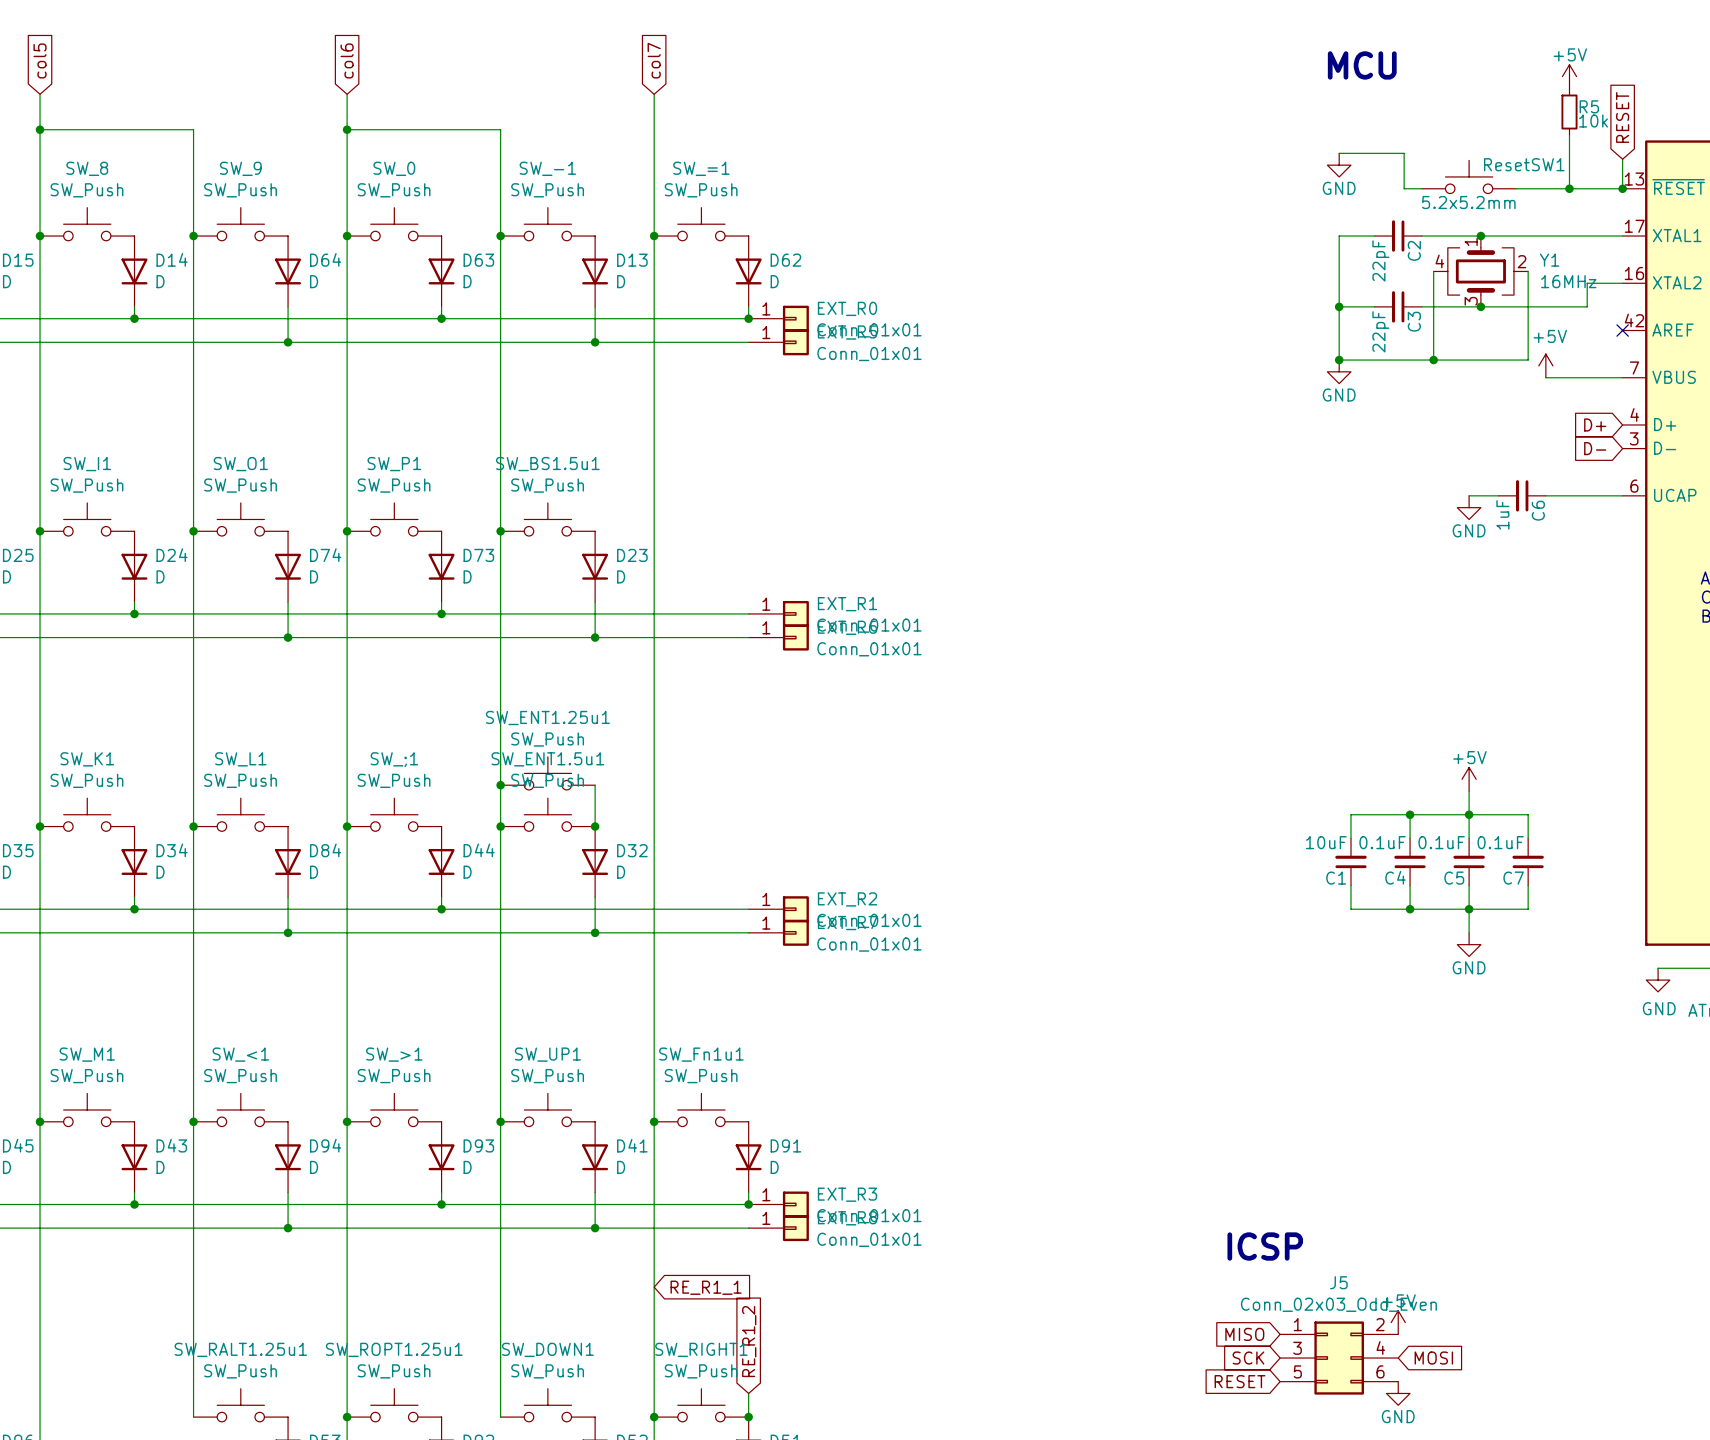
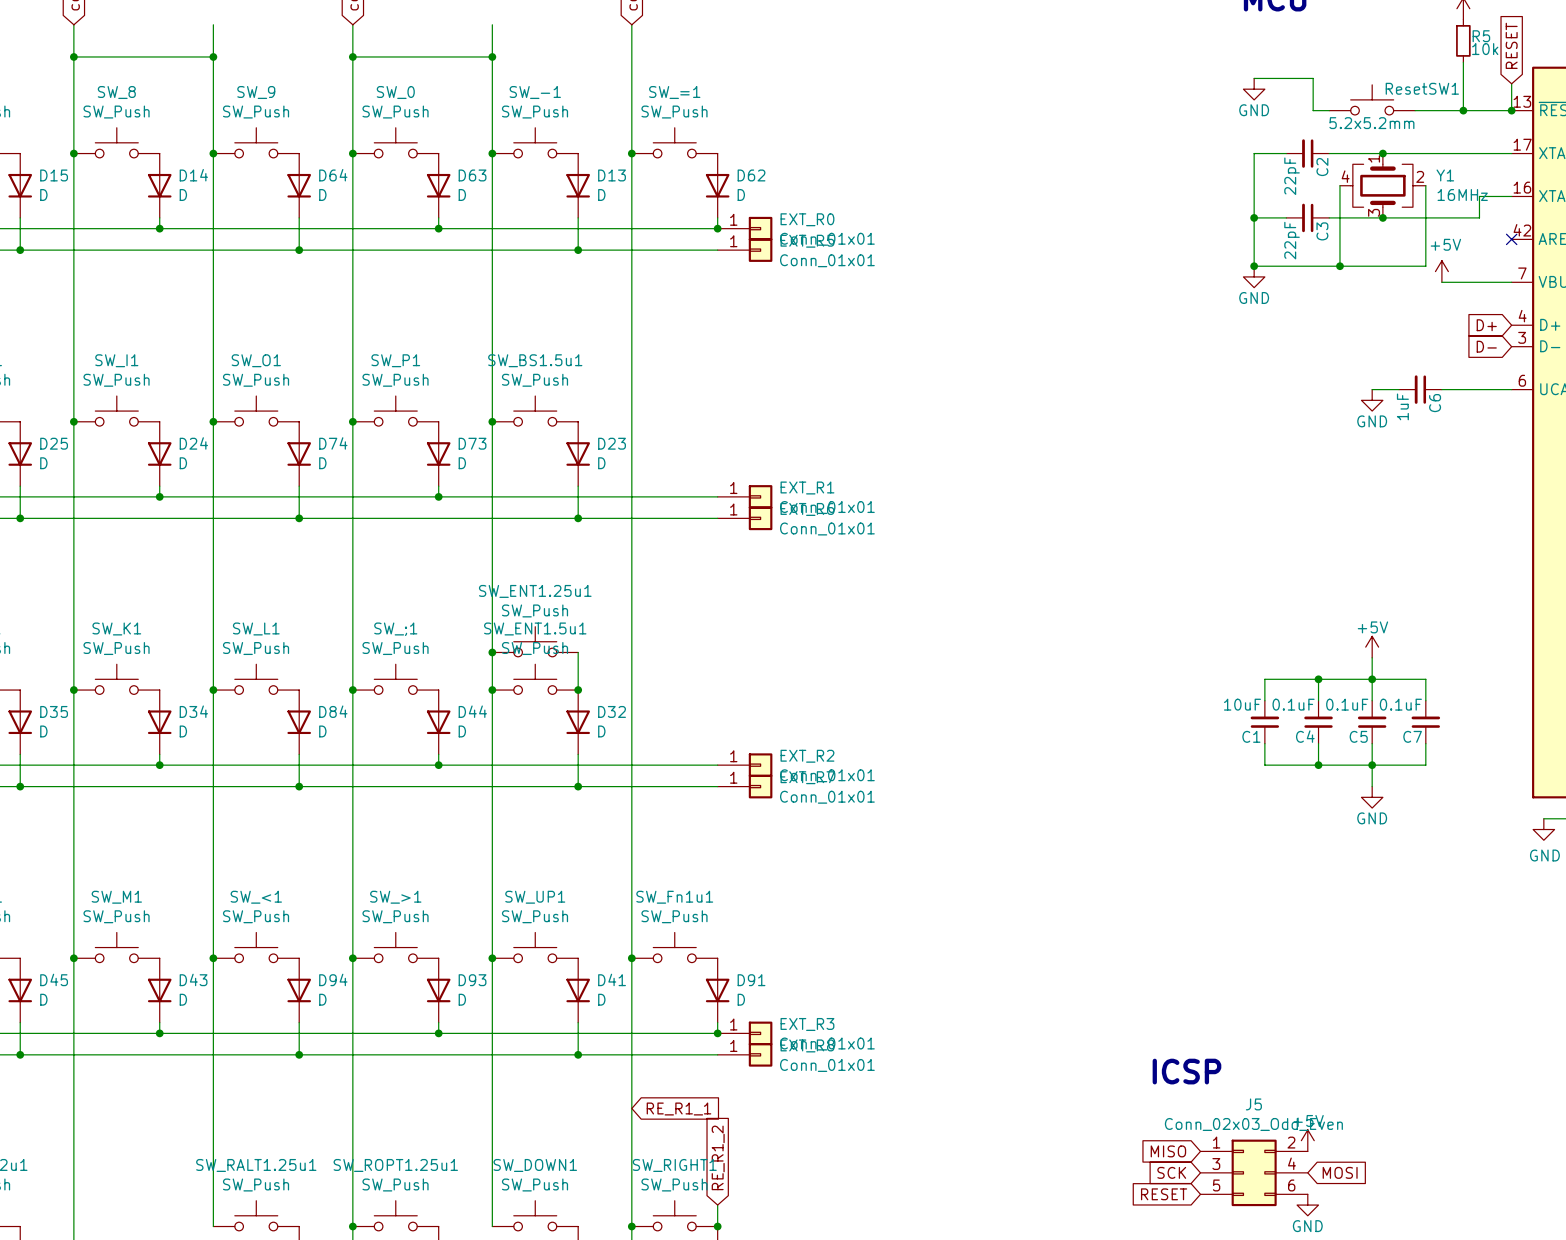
wire: none -> (213, 24) (213, 56)
wire: none -> (492, 24) (492, 56)
junction: none -> (213, 56)
junction: none -> (492, 56)

